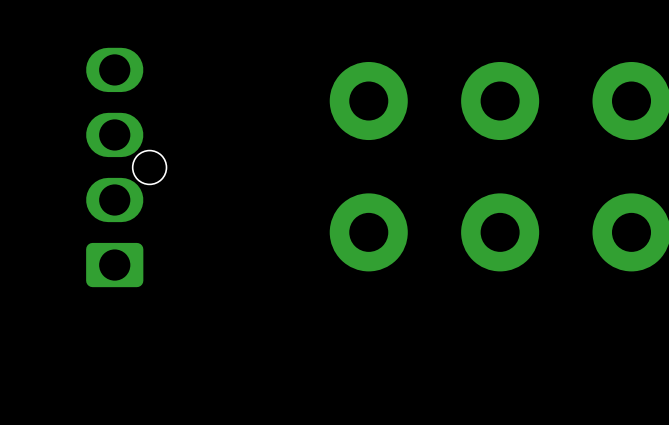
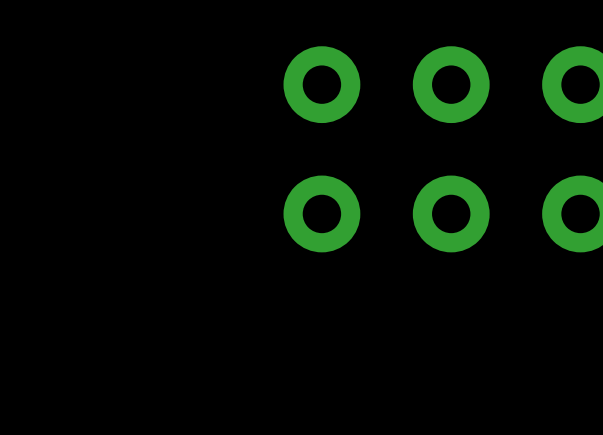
part: (126, 167) -> none

